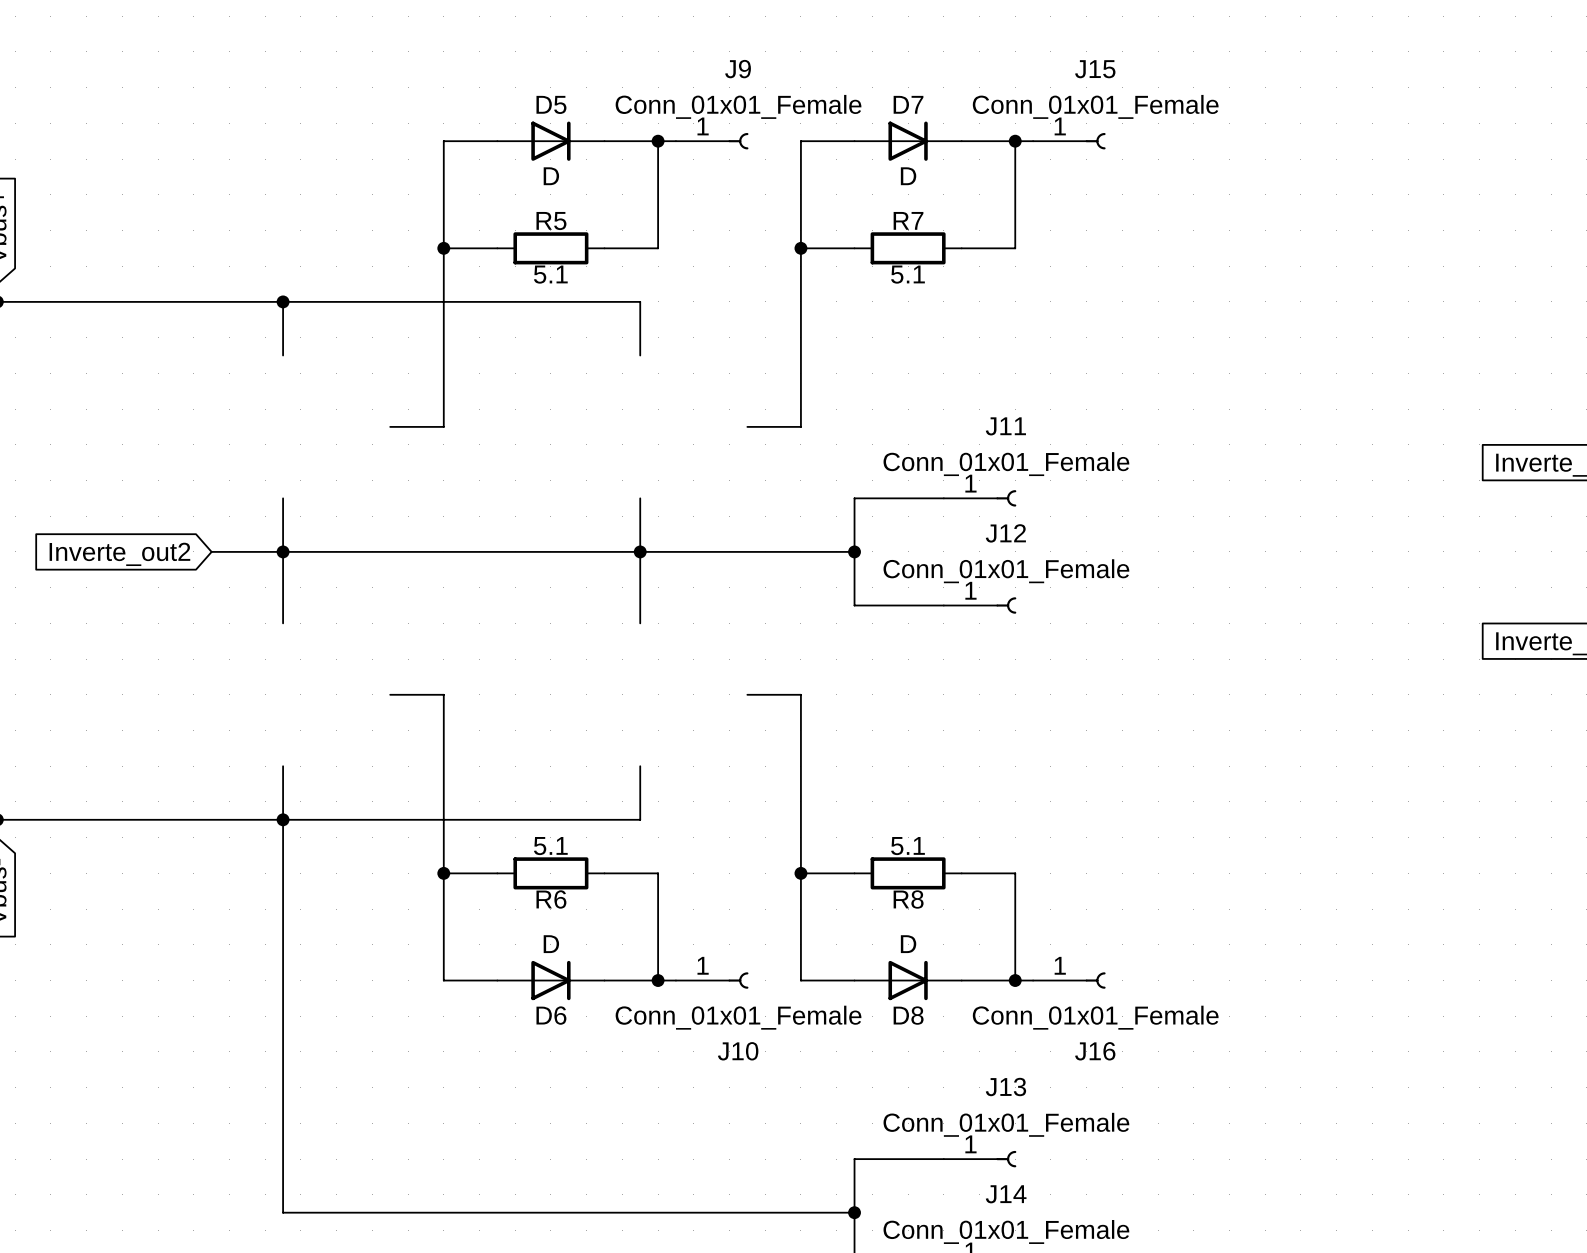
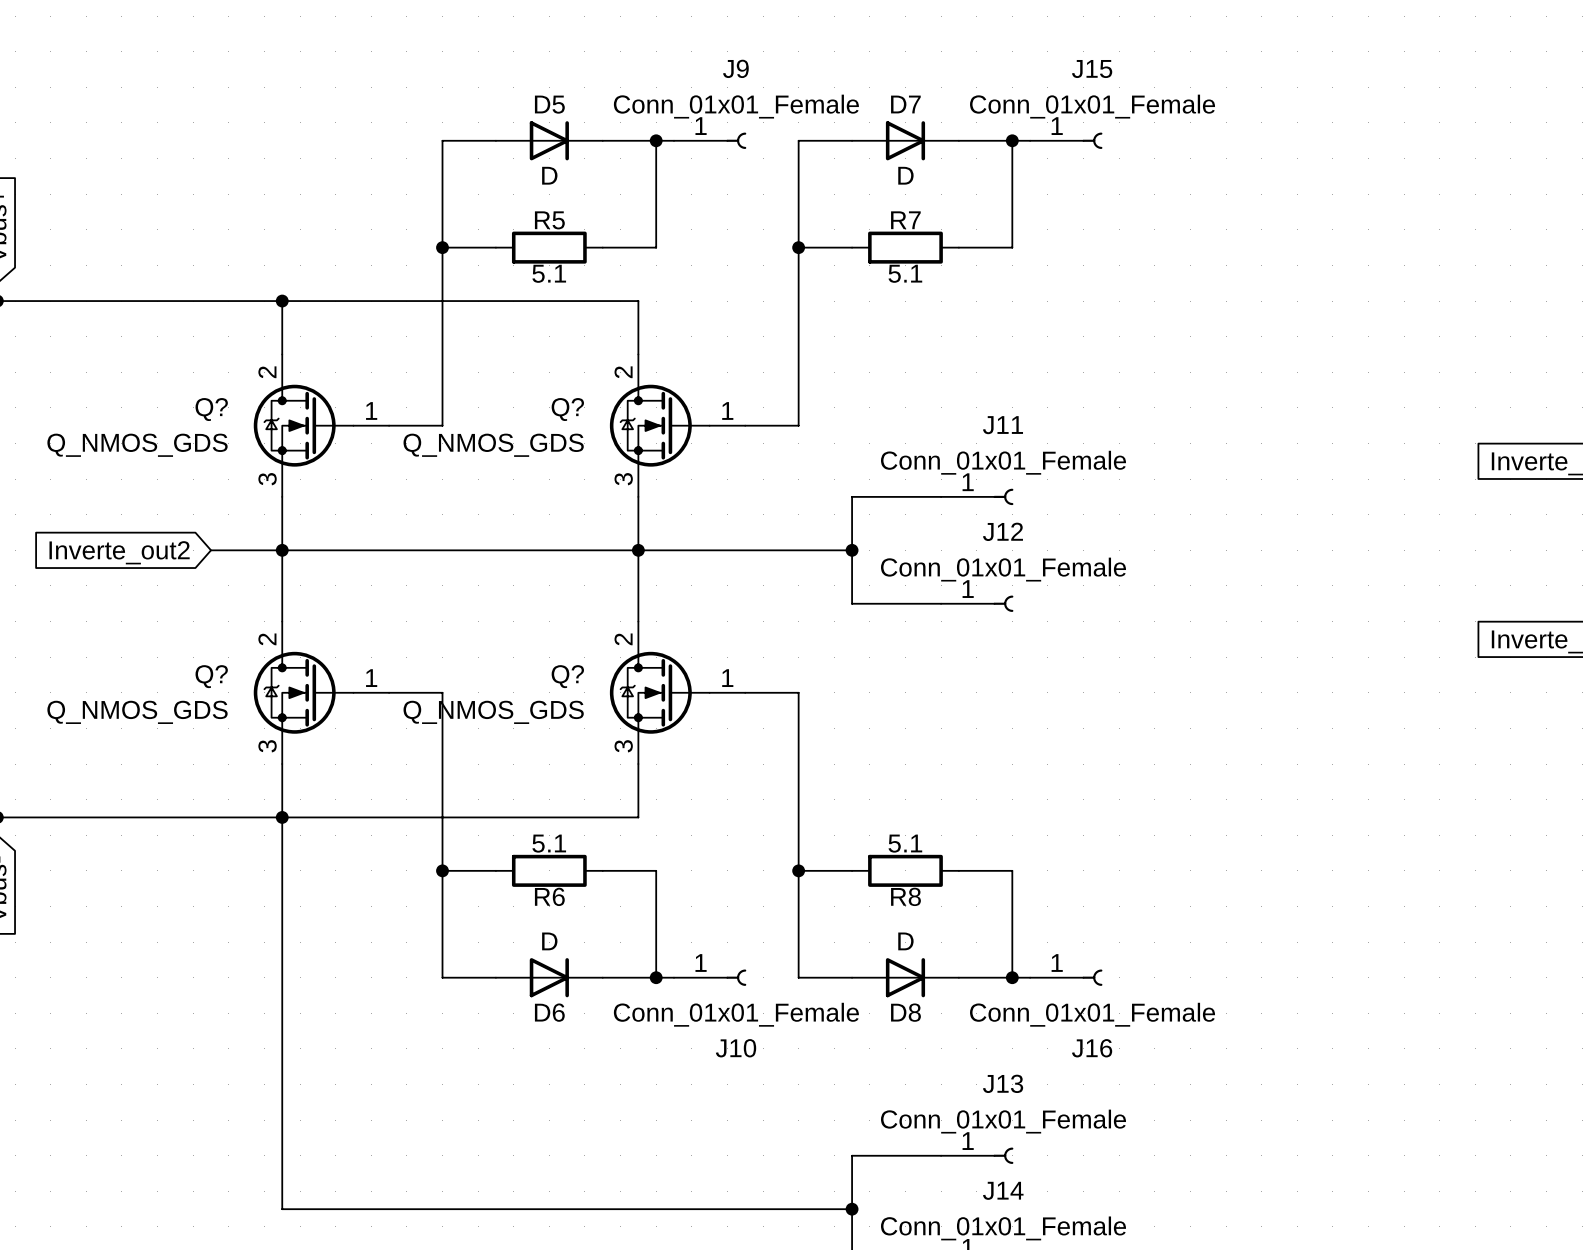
Q?: none -> Q_NMOS_GDS (321, 425)
Q?: none -> Q_NMOS_GDS (677, 425)
Q?: none -> Q_NMOS_GDS (321, 692)
Q?: none -> Q_NMOS_GDS (677, 692)

